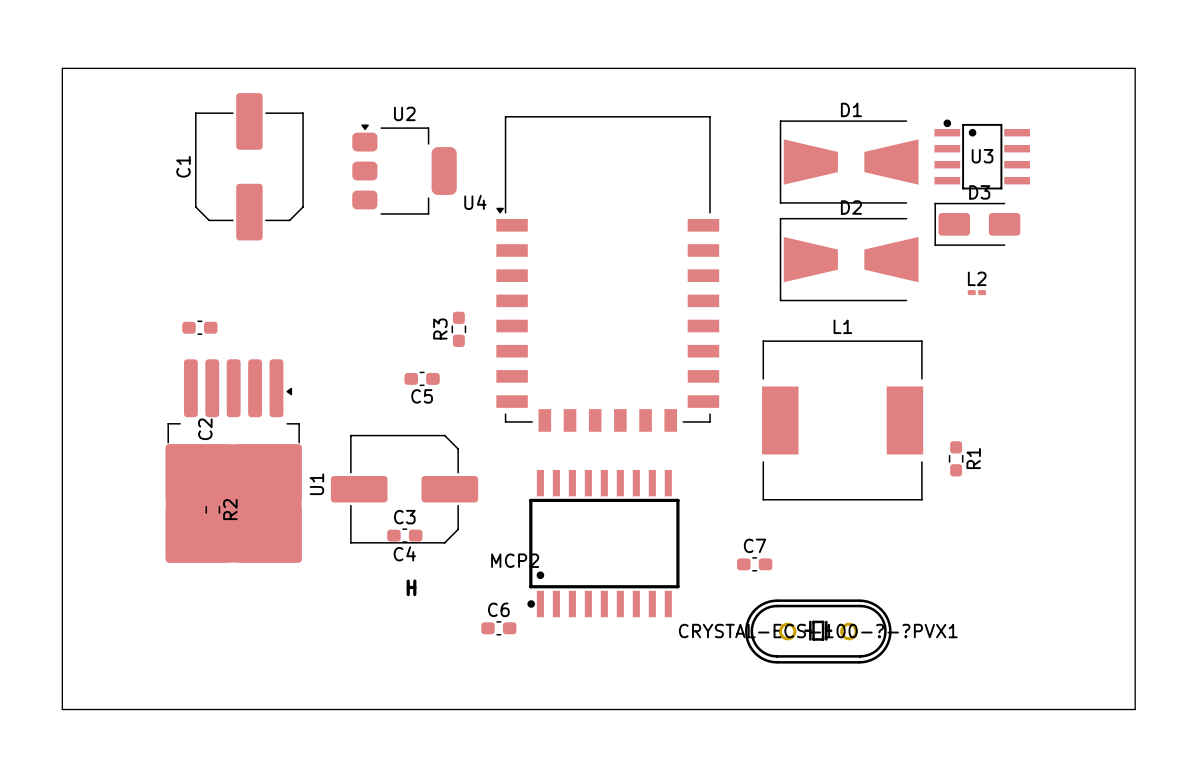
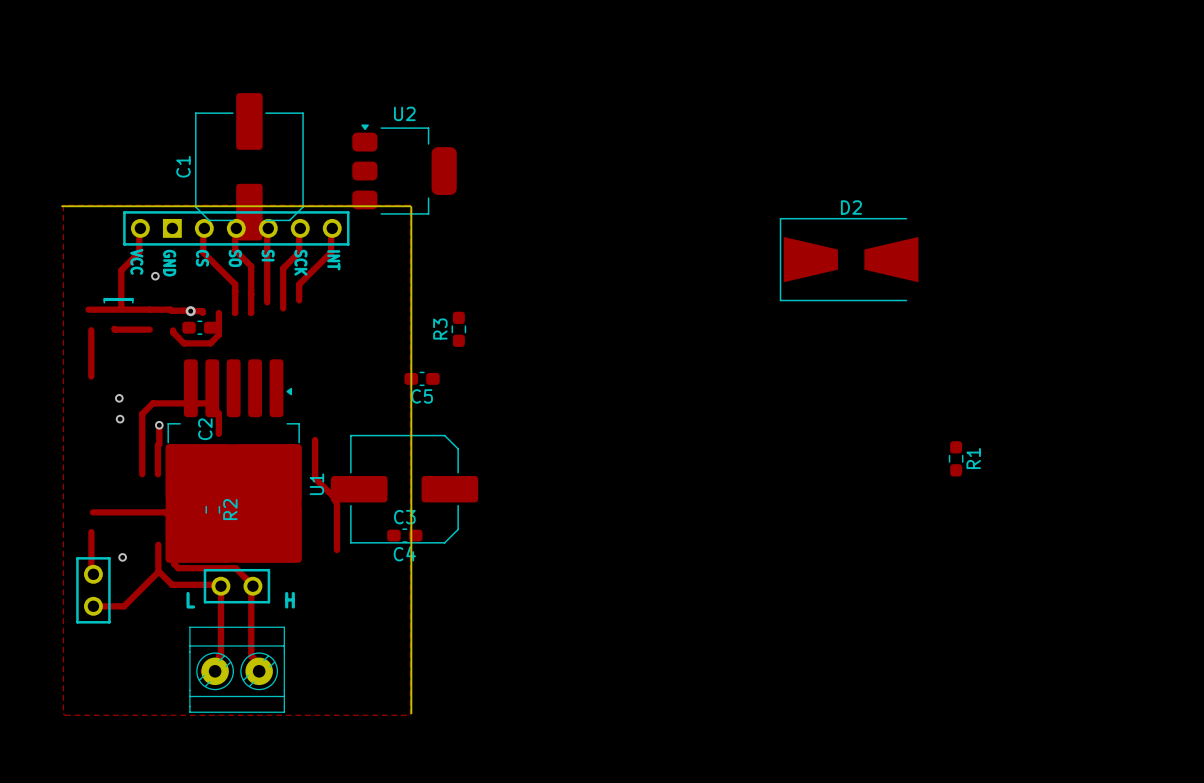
board edge: (62, 68) (1135, 68) (1135, 709) (62, 709) (62, 68) -> none
U3: (982, 154) -> none
D1: (849, 162) -> none
zone outline: none -> (63, 205) (410, 205) (410, 715) (64, 715) (63, 713) (63, 205)
board edge: none -> (62, 206) (410, 206)
board edge: none -> (411, 207) (411, 713)
track: none -> (205, 222) (203, 224) (203, 252) (235, 284) (234, 312)
D3: (977, 224) -> none
track: none -> (139, 226) (139, 252) (121, 270) (121, 306)
part: none -> (236, 228)
track: none -> (329, 228) (331, 230) (331, 252) (299, 284) (299, 300)
track: none -> (265, 230) (267, 232) (267, 302)
track: none -> (235, 234) (235, 250) (251, 266) (250, 312)
track: none -> (299, 234) (299, 252) (283, 268) (283, 308)
text: none -> SI (268, 255)
text: none -> CS (202, 258)
text: none -> SO (235, 258)
text: none -> INT (333, 260)
text: none -> VCC (136, 261)
text: none -> SCK (300, 262)
text: none -> GND (169, 263)
U4: (607, 273) -> none
via: none -> (155, 276)
L2: (976, 292) -> none
line: none -> (104, 300) (132, 300)
line: none -> (104, 302) (104, 298) (132, 298) (132, 302)
track: none -> (88, 309) (170, 309) (202, 311) (202, 312)
via: none -> (190, 311)
track: none -> (218, 312) (218, 334) (210, 343) (184, 343) (173, 330)
track: none -> (114, 328) (149, 329)
track: none -> (91, 330) (91, 376)
via: none -> (119, 398)
via: none -> (120, 419)
L1: (842, 420) -> none
via: none -> (159, 425)
track: none -> (159, 426) (159, 444)
track: none -> (218, 433) (218, 413) (208, 403) (152, 403) (142, 414) (142, 474)
track: none -> (315, 439) (315, 478) (335, 498)
track: none -> (157, 444) (157, 474)
track: none -> (334, 500) (336, 502) (336, 550)
track: none -> (92, 512) (165, 512) (173, 520) (174, 563) (178, 568) (235, 568) (250, 582)
track: none -> (91, 532) (91, 573)
MCP2: (603, 543) -> none
track: none -> (158, 544) (158, 572) (124, 606) (93, 606)
via: none -> (122, 557)
C7: (754, 564) -> none
track: none -> (158, 571) (172, 584) (220, 584)
track: none -> (220, 586) (220, 654) (219, 661) (214, 665) (209, 665) (203, 671)
part: none -> (236, 586)
track: none -> (251, 587) (251, 655) (267, 672)
text position: H (411, 587) -> H (290, 600)
part: none -> (93, 590)
text: none -> L (190, 600)
C6: (498, 628) -> none
CRYSTAL-ECS-100-?-?PVX1: (818, 631) -> none
part: none -> (237, 669)

